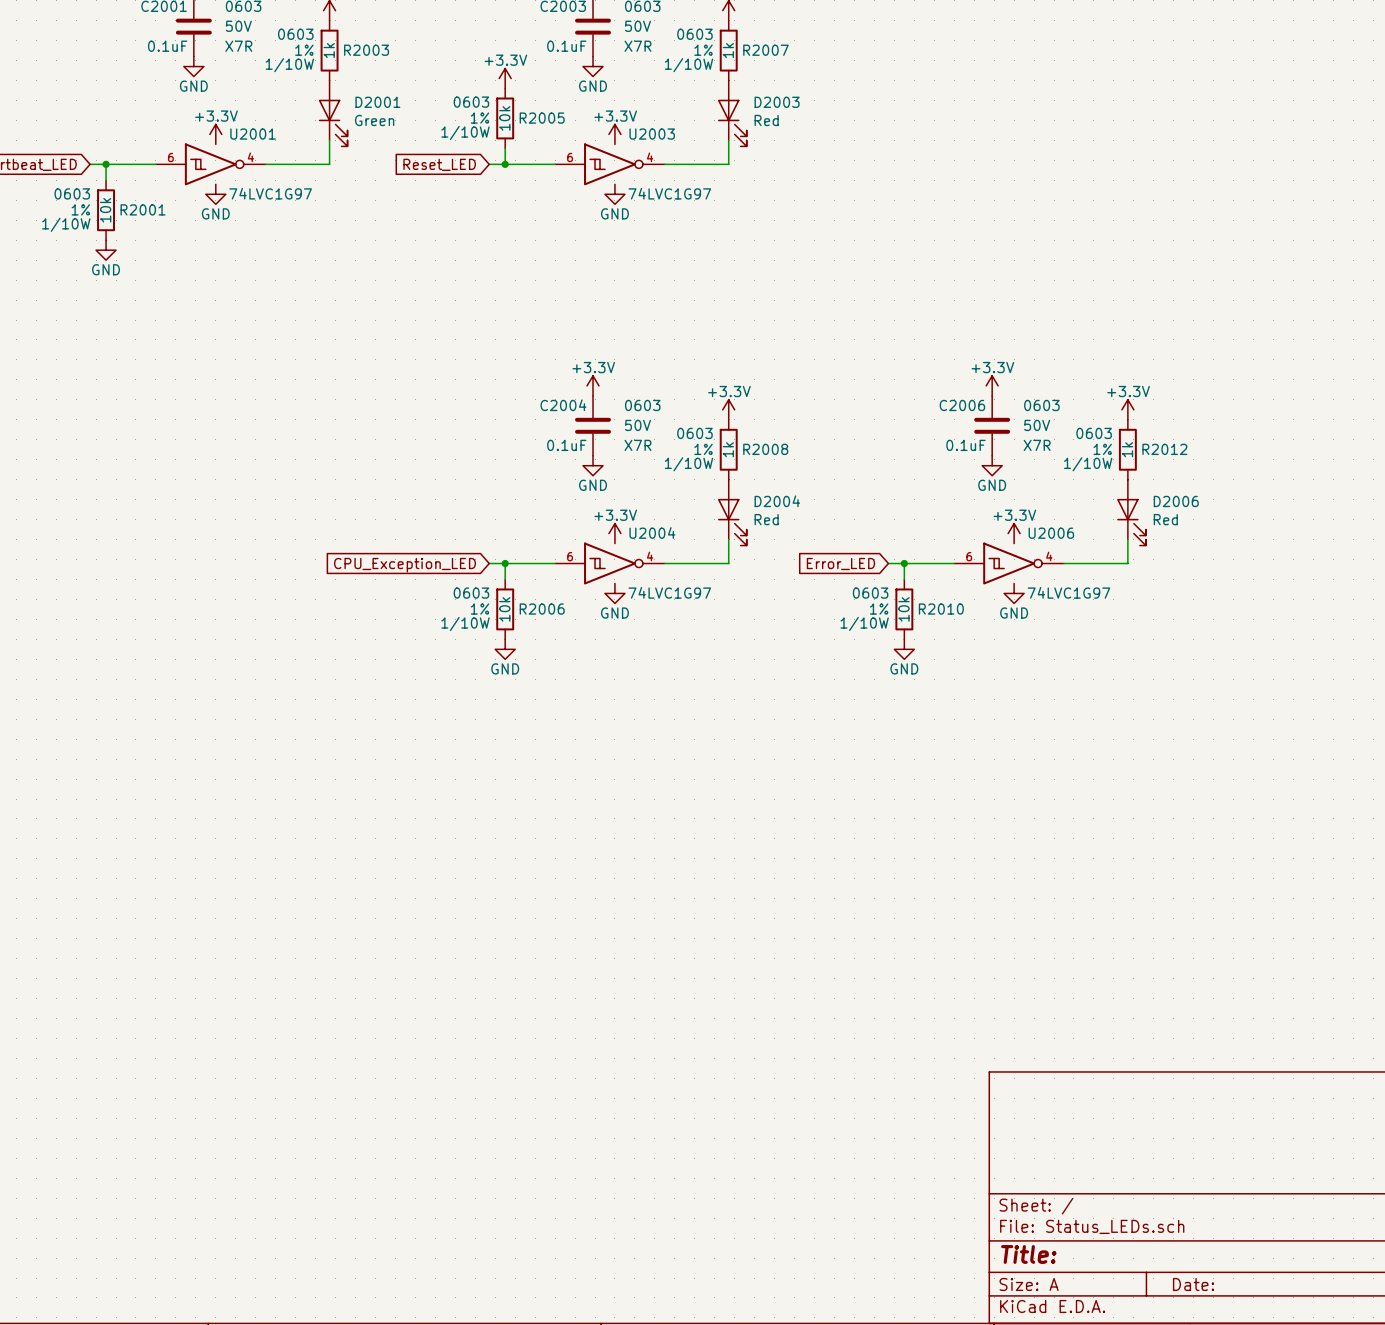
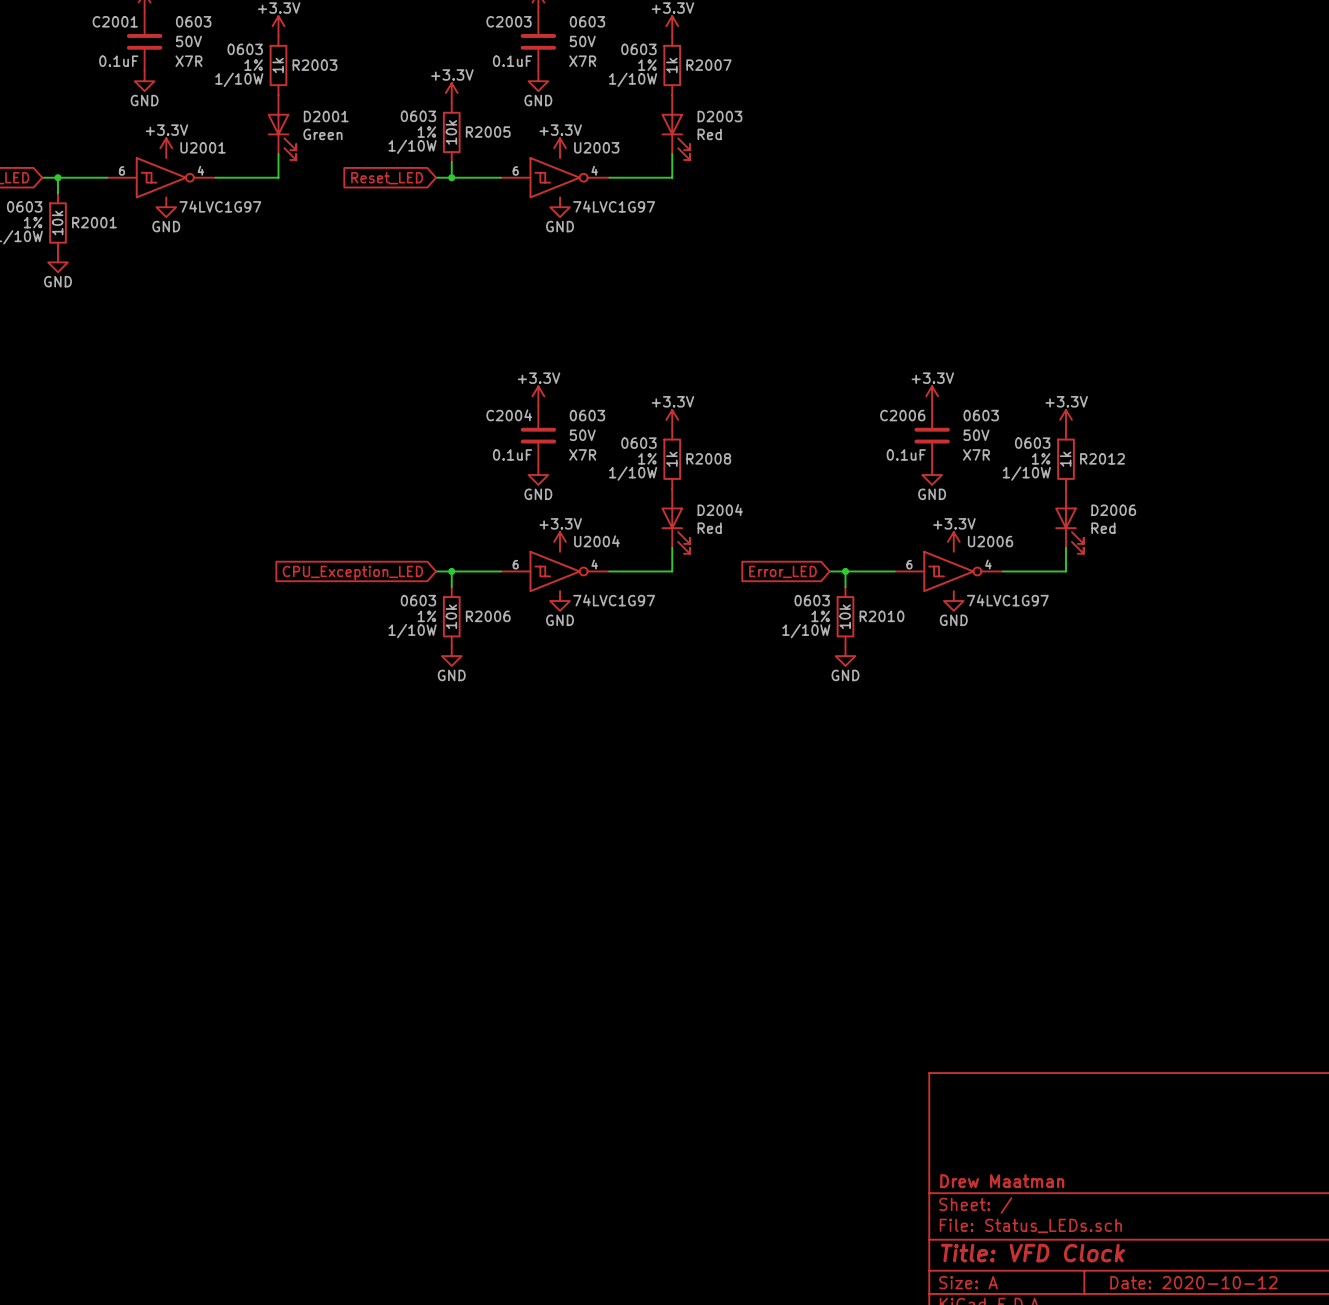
title block: none -> Drew Maatman (1002, 1181)
title block: Title: (1028, 1254) -> Title: VFD Clock (1032, 1253)
title block: Date: (1193, 1284) -> Date: 2020-10-12 (1193, 1282)

